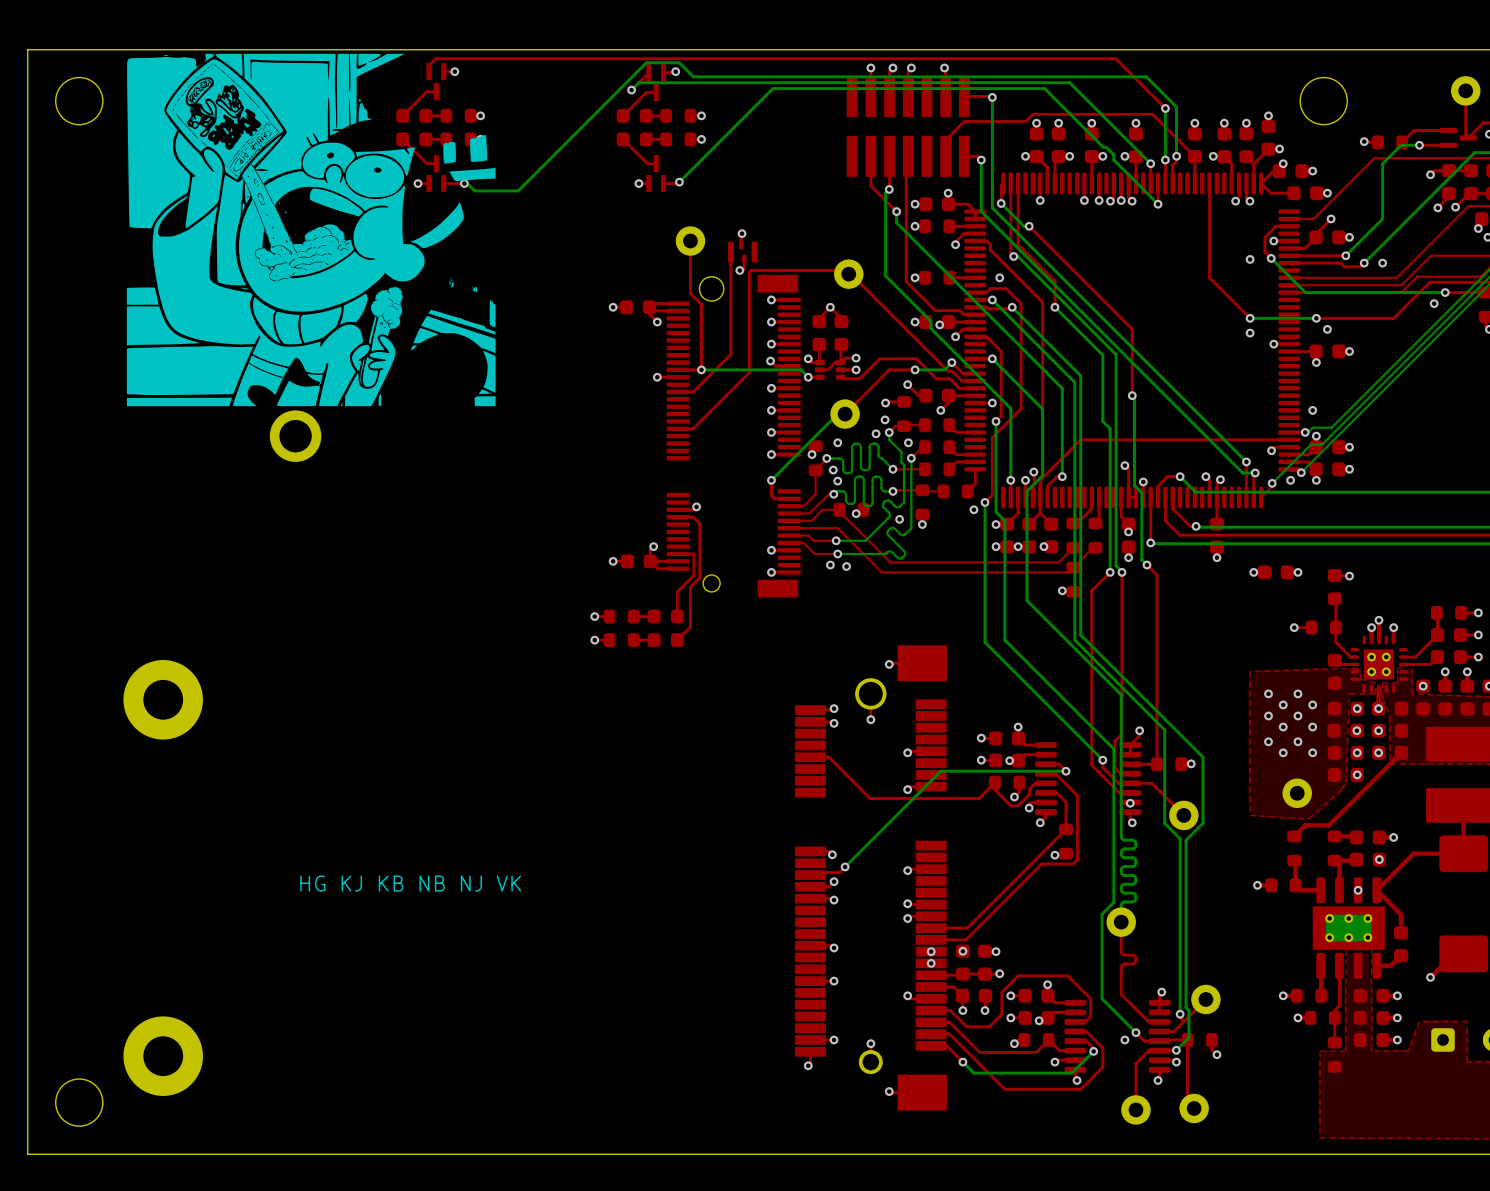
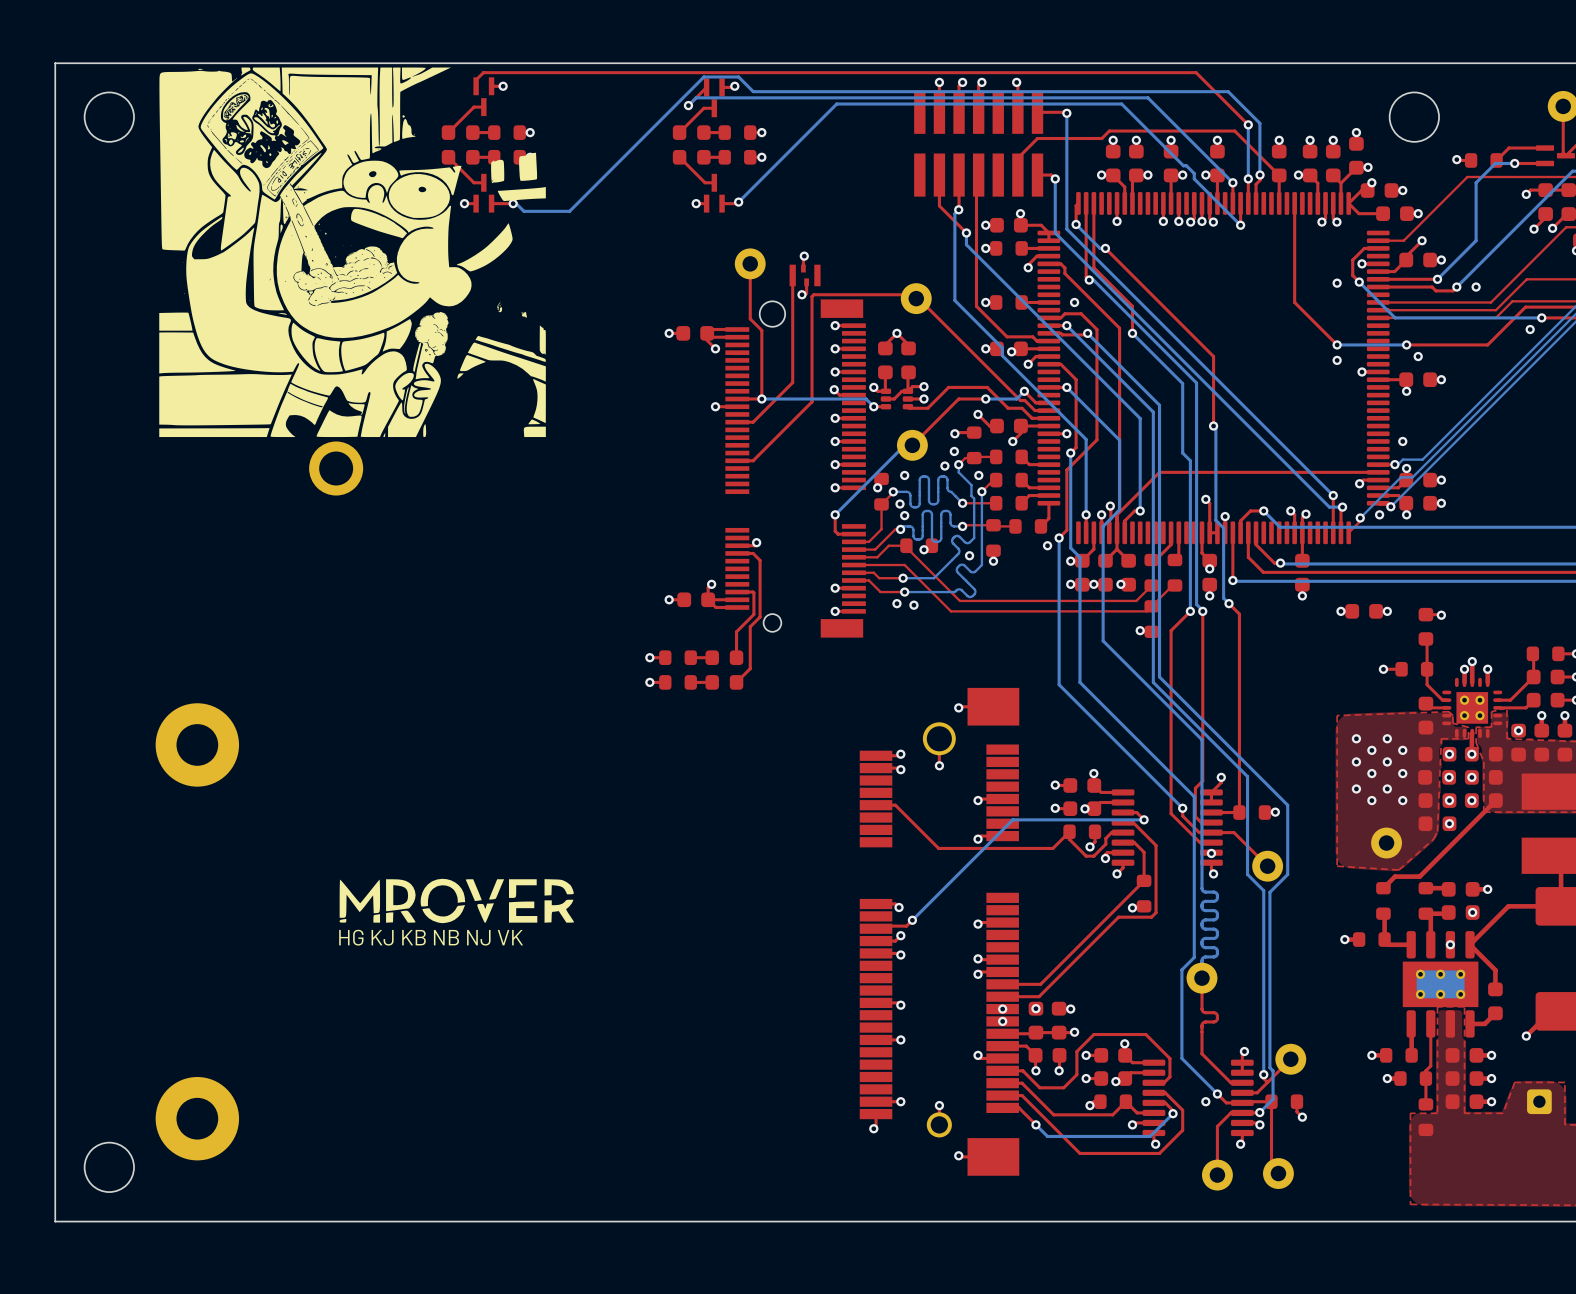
drawing: none -> [339, 878, 575, 924]

